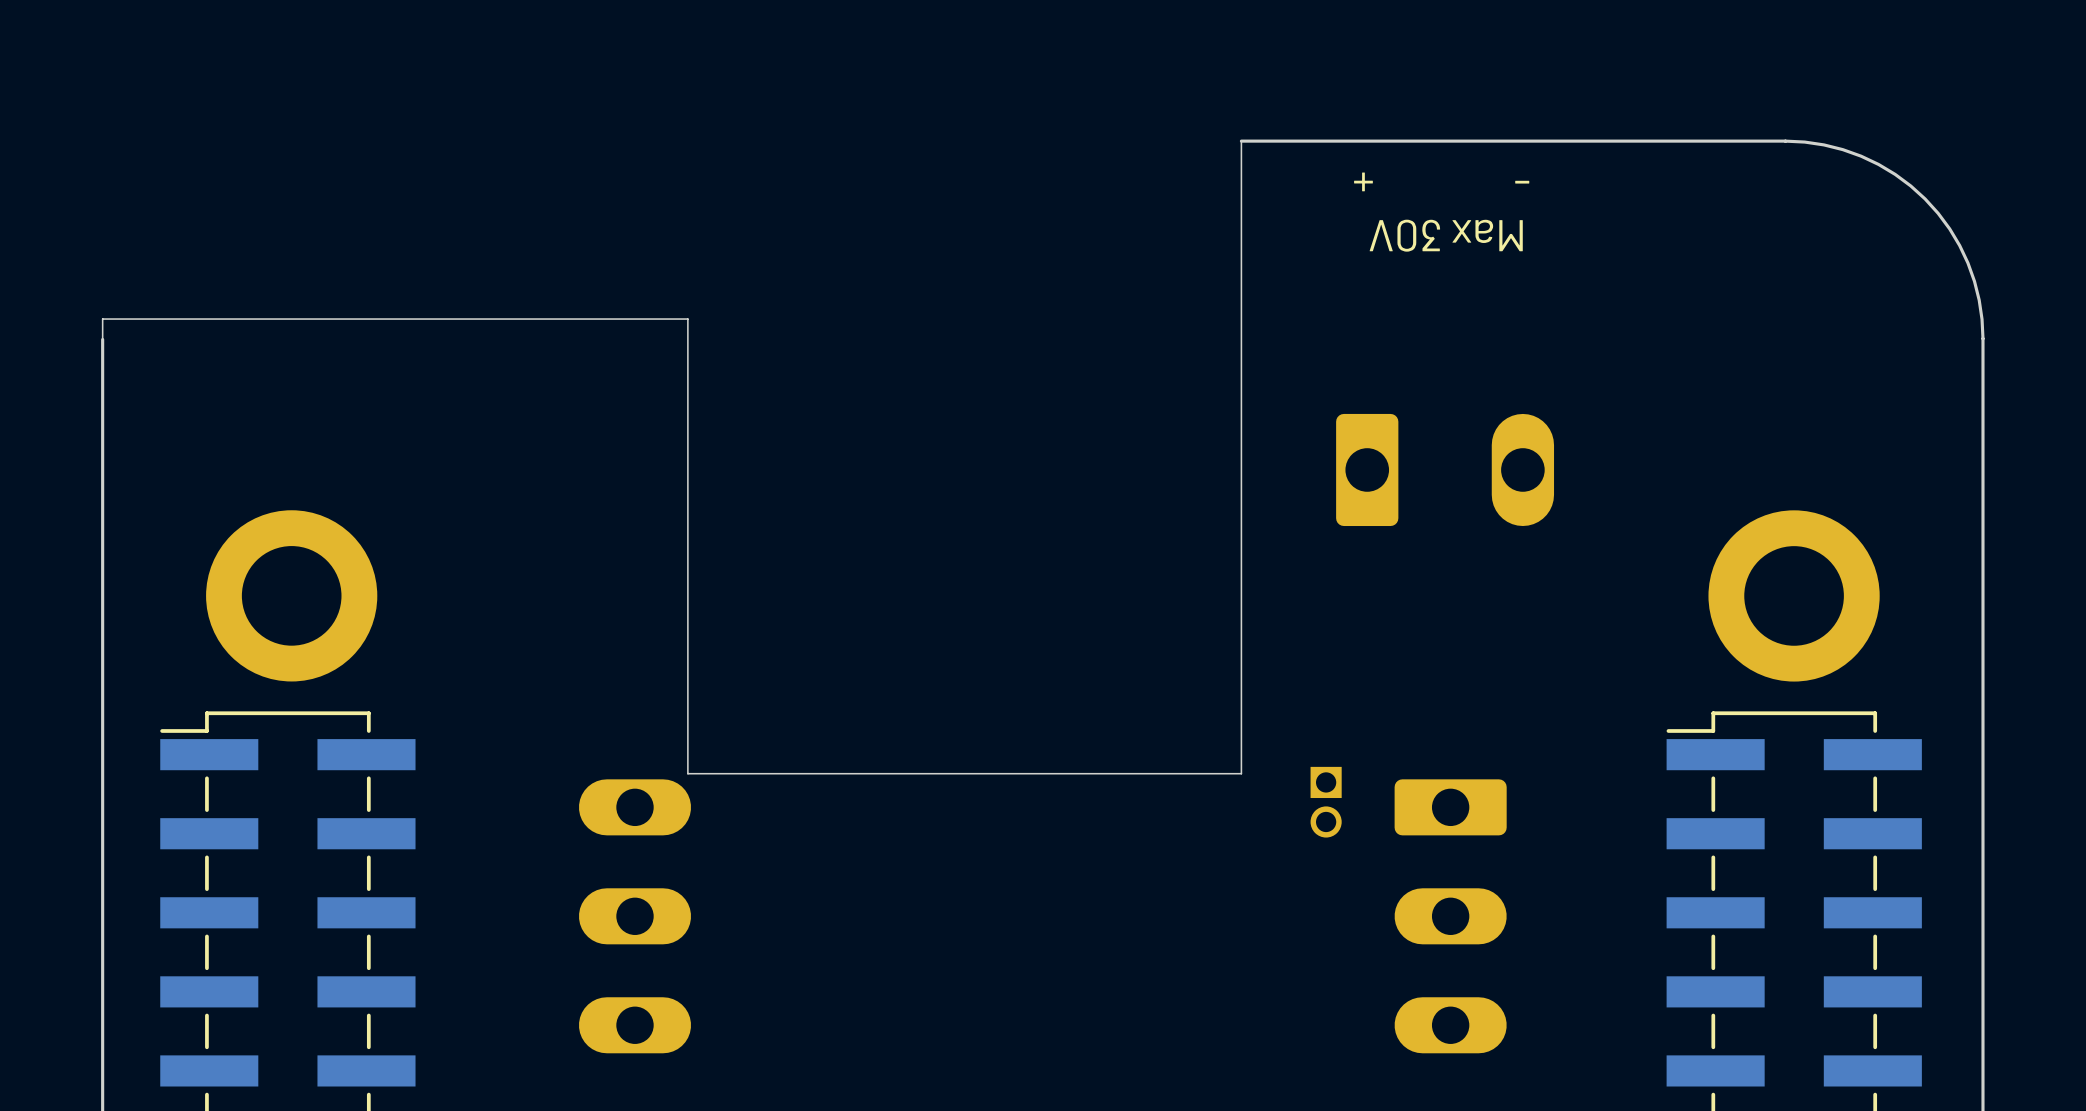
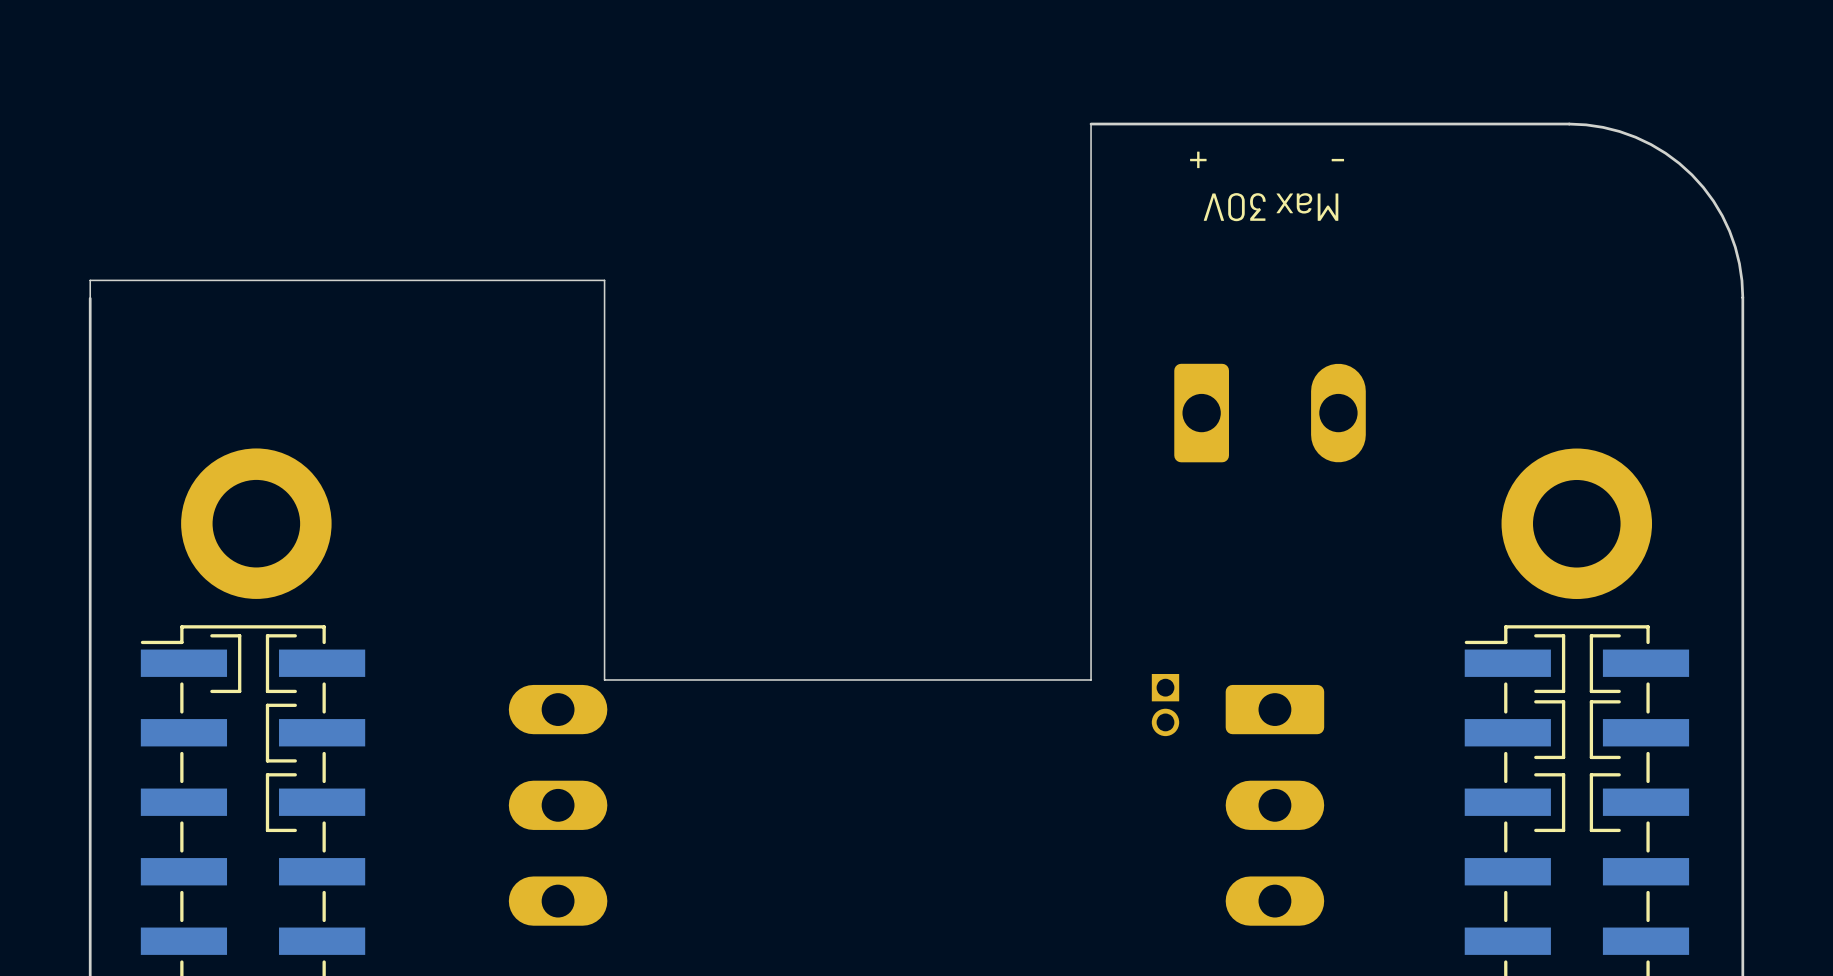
line: none -> (211, 635) (239, 635) (239, 691) (211, 691)
line: none -> (295, 635) (267, 635) (267, 691) (295, 691)
line: none -> (1535, 635) (1563, 635) (1563, 691) (1535, 691)
line: none -> (1619, 635) (1591, 635) (1591, 691) (1619, 691)
line: none -> (1535, 701) (1563, 701) (1563, 757) (1535, 757)
line: none -> (1619, 701) (1591, 701) (1591, 757) (1619, 757)
line: none -> (295, 705) (267, 705) (267, 760) (295, 760)
line: none -> (295, 774) (267, 774) (267, 830) (295, 830)
line: none -> (1535, 774) (1563, 774) (1563, 830) (1535, 830)
line: none -> (1619, 774) (1591, 774) (1591, 830) (1619, 830)

